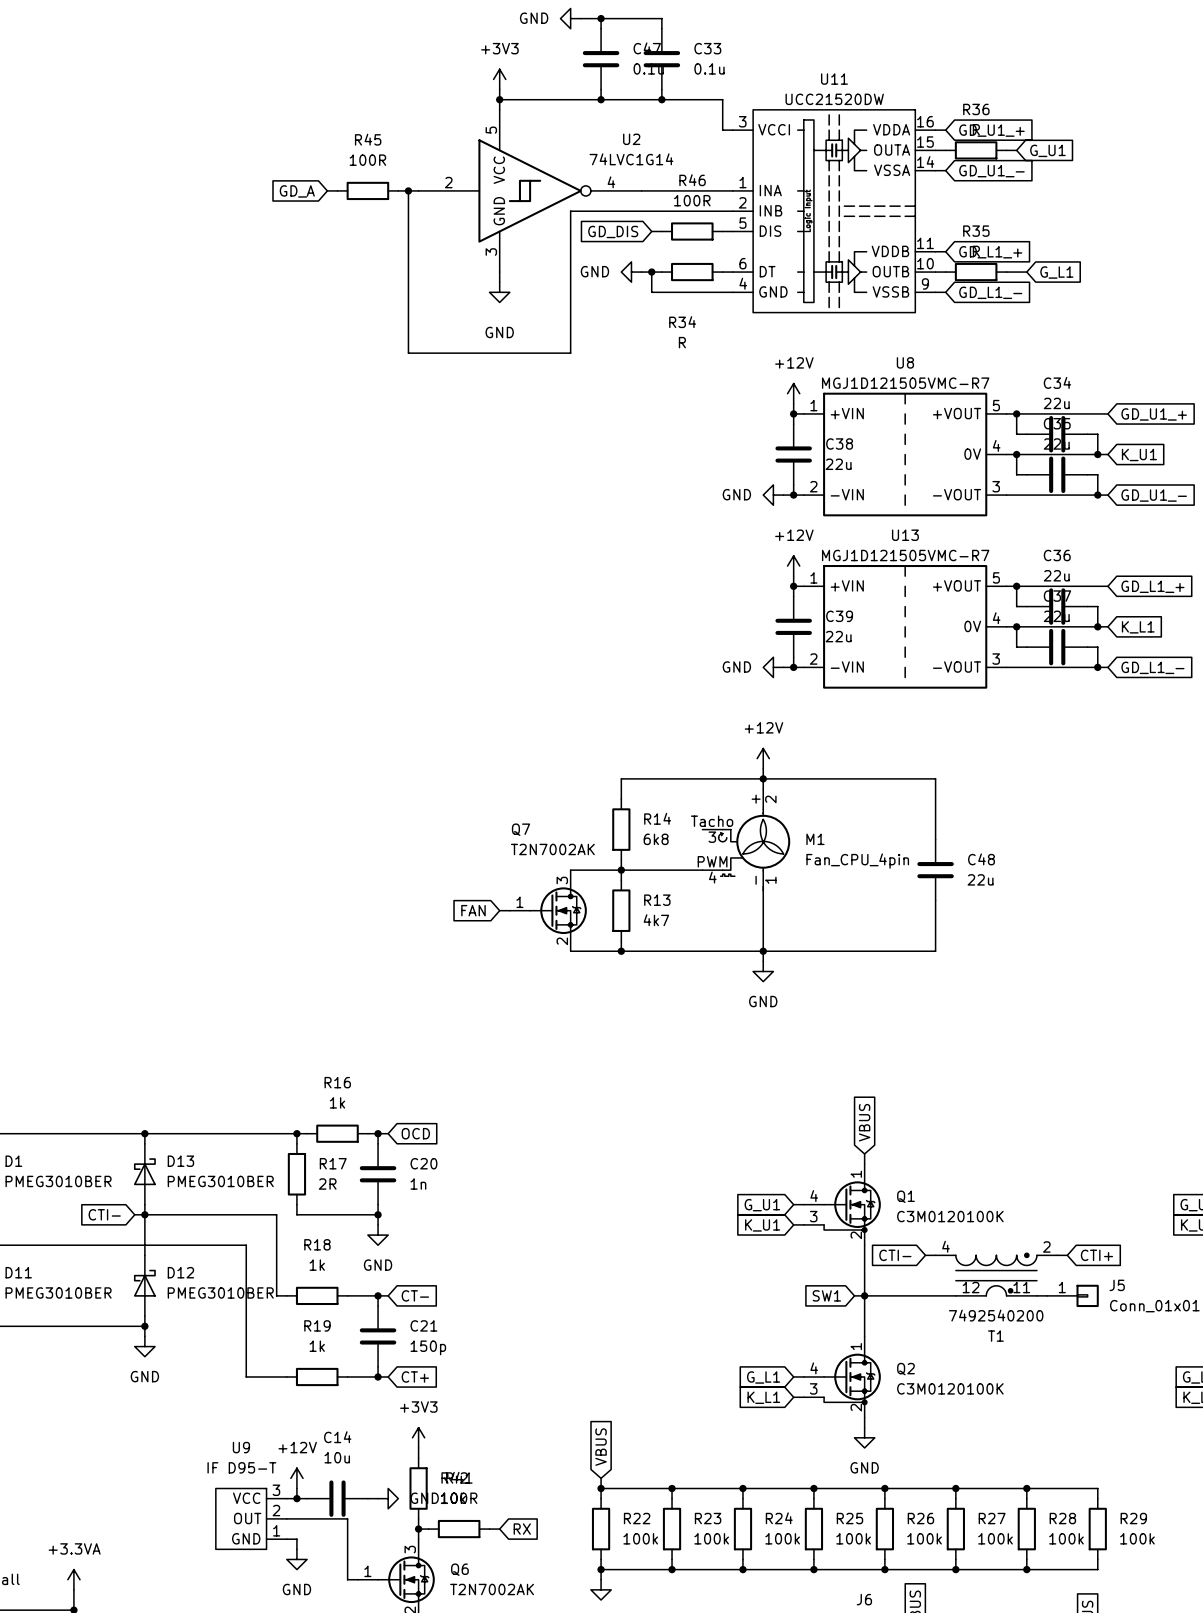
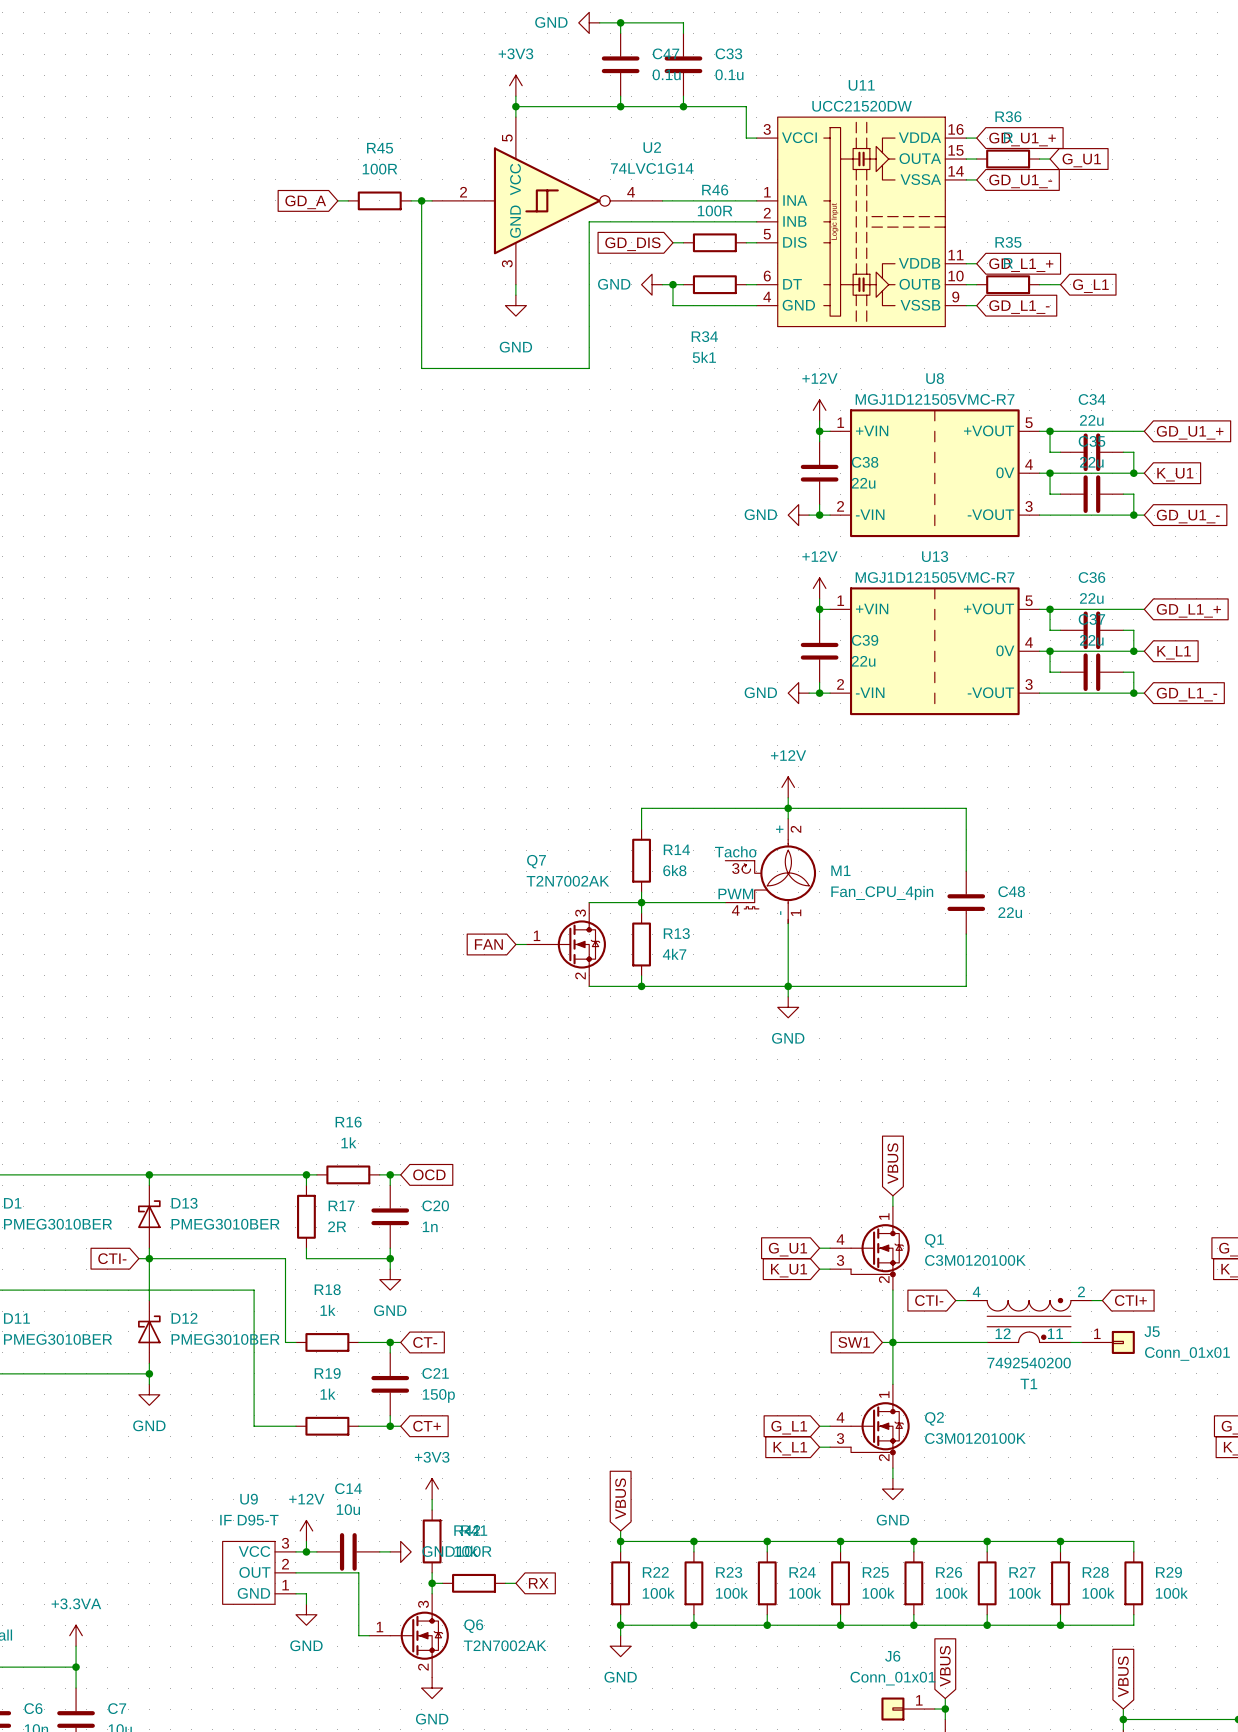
R34 value: R (682, 342) -> 5k1 (704, 357)

